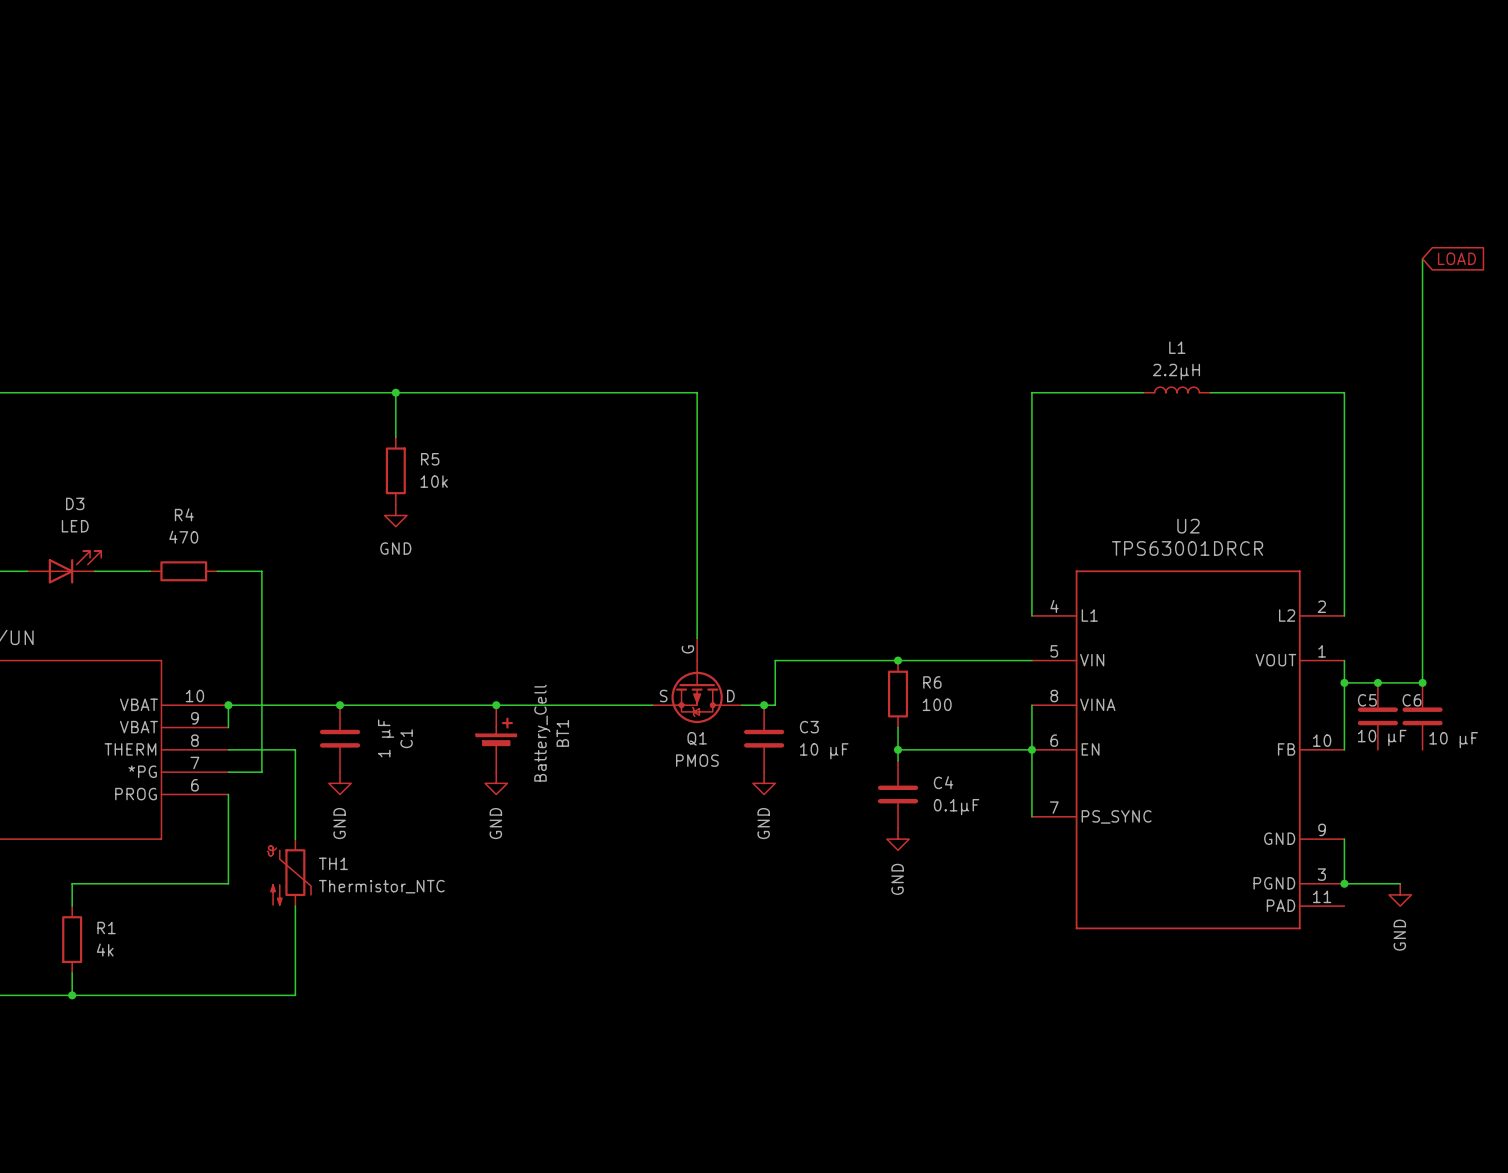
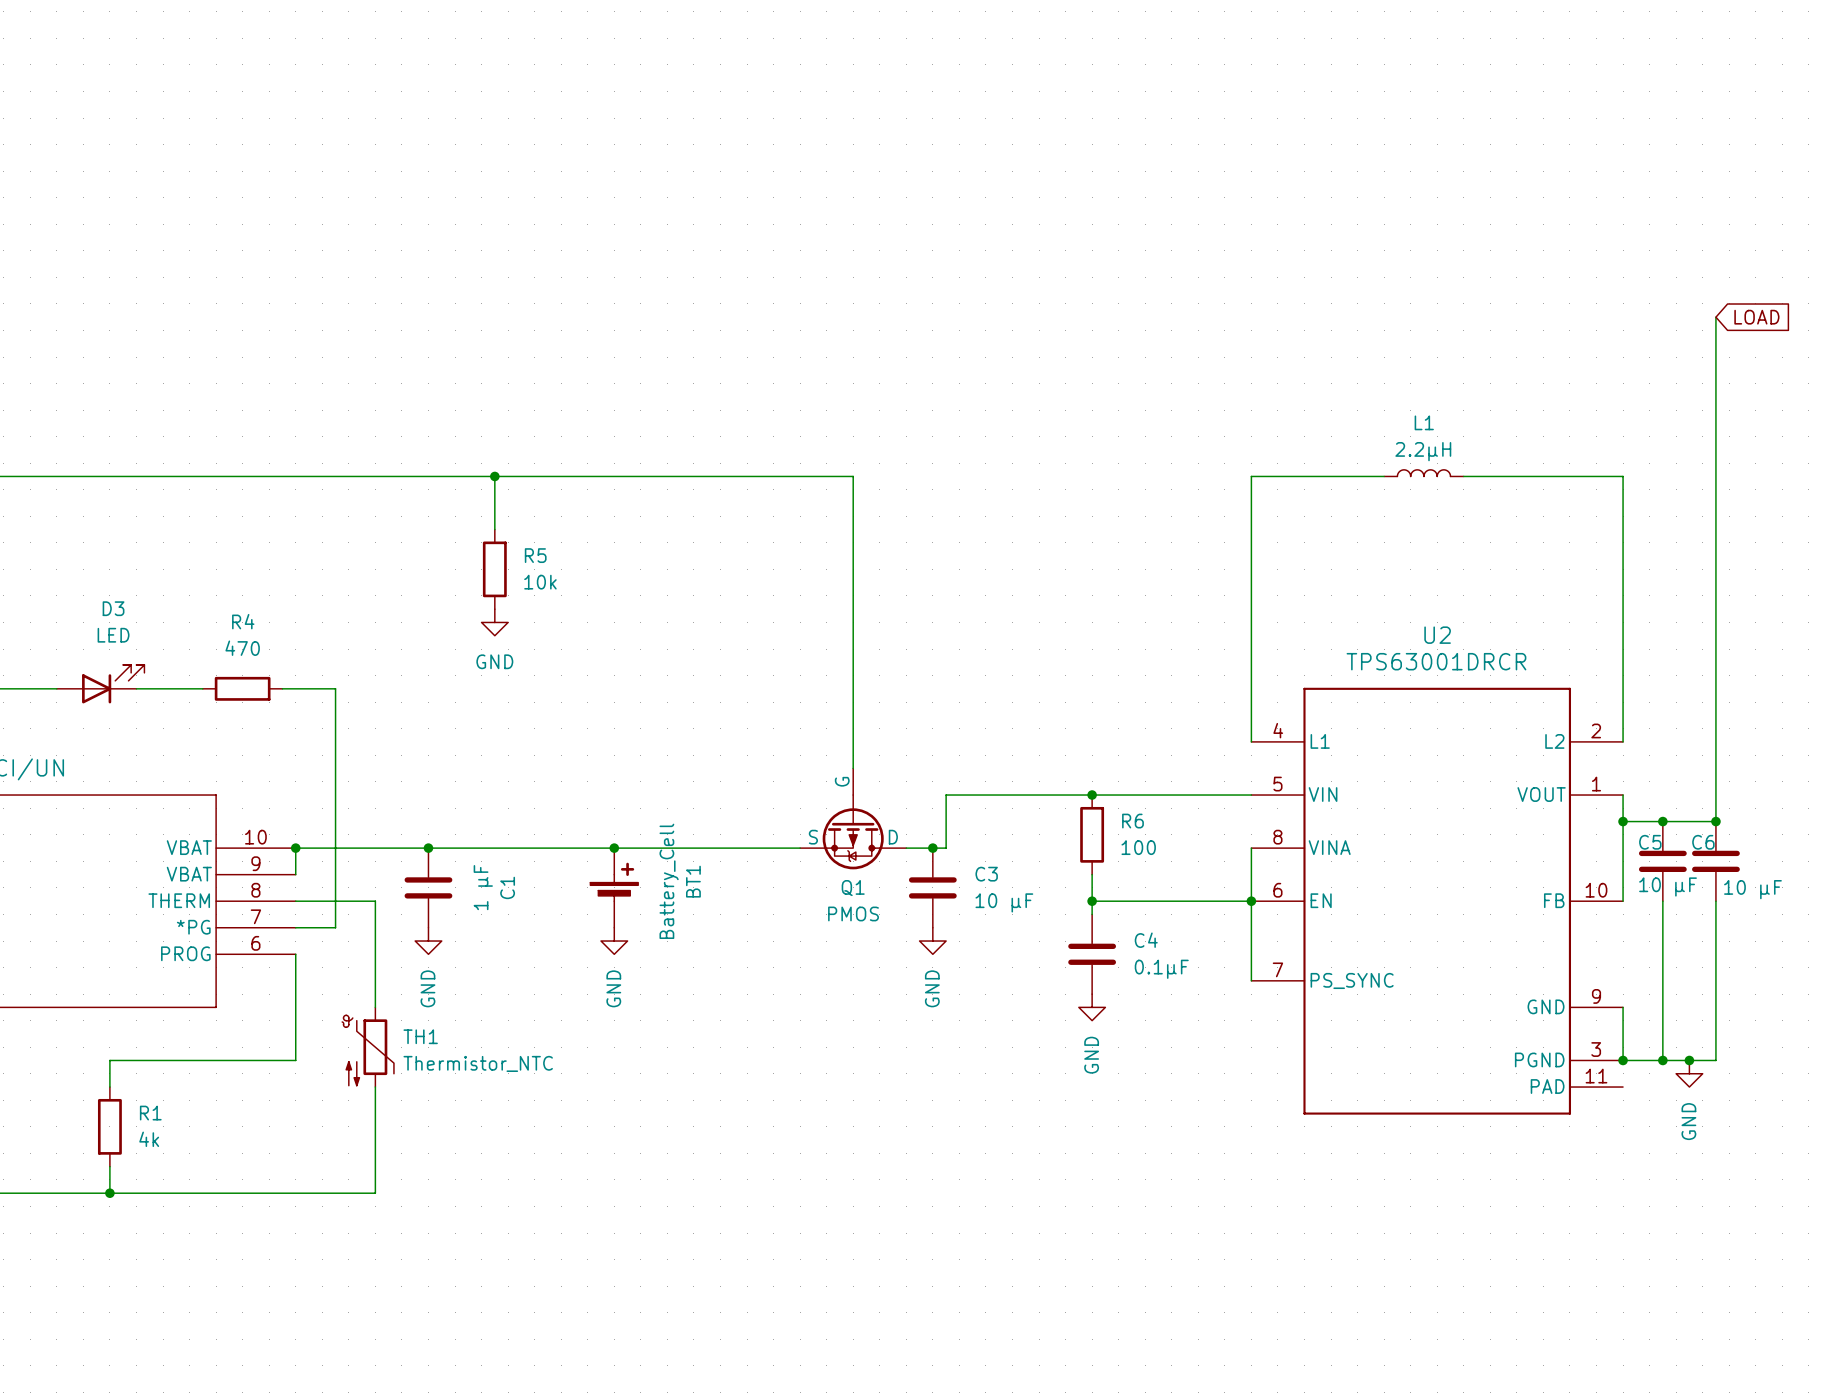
wire: none -> (1662, 901) (1662, 1060)
wire: none -> (1715, 901) (1715, 1060) (1689, 1060)
junction: none -> (1662, 1060)
junction: none -> (1689, 1060)

